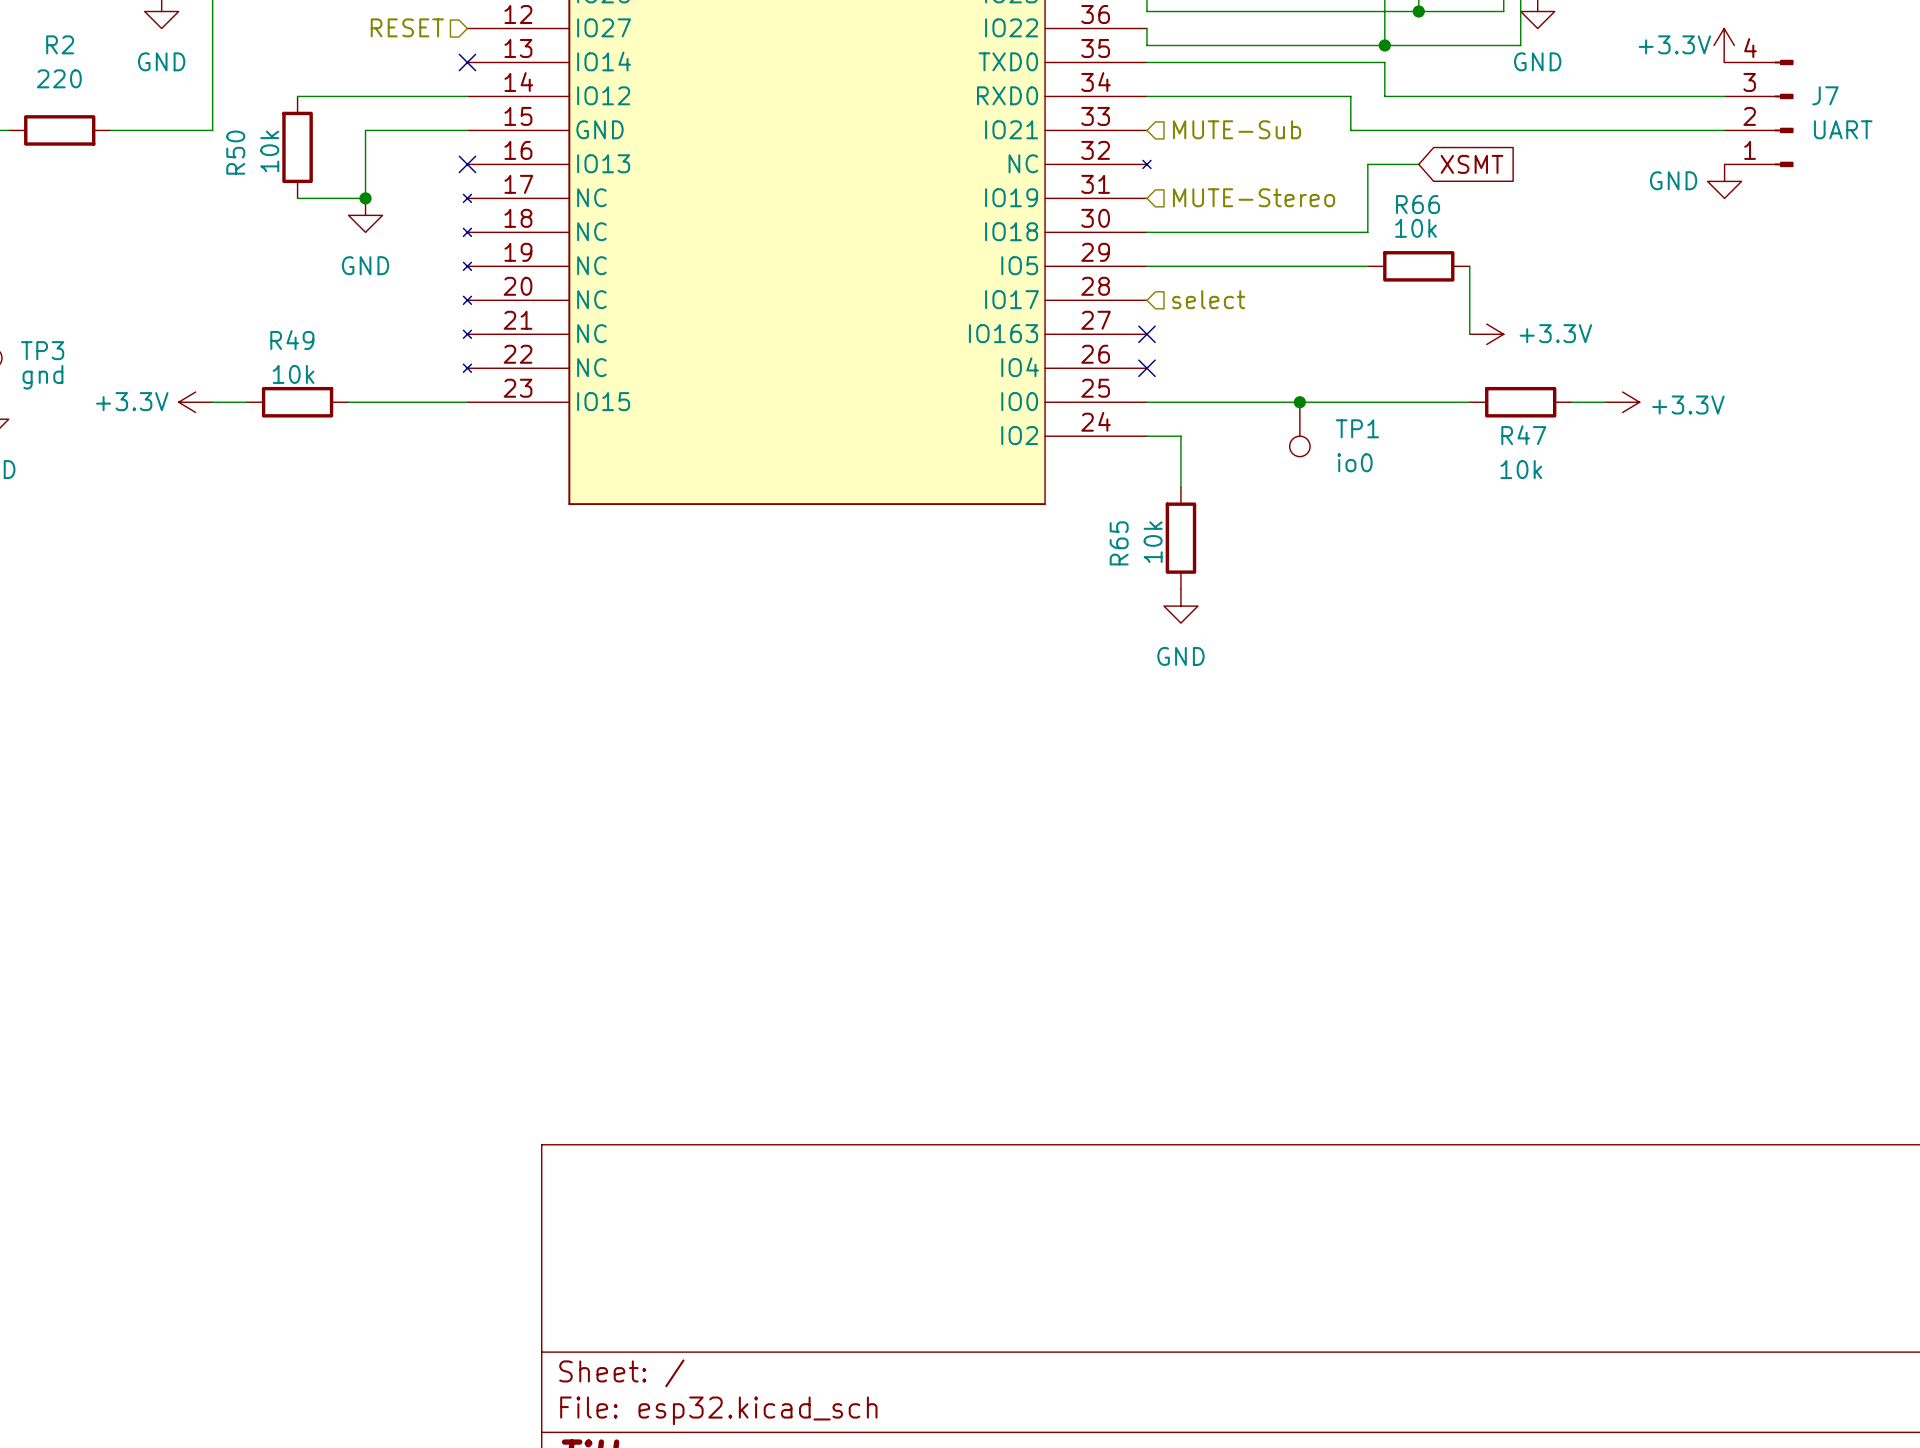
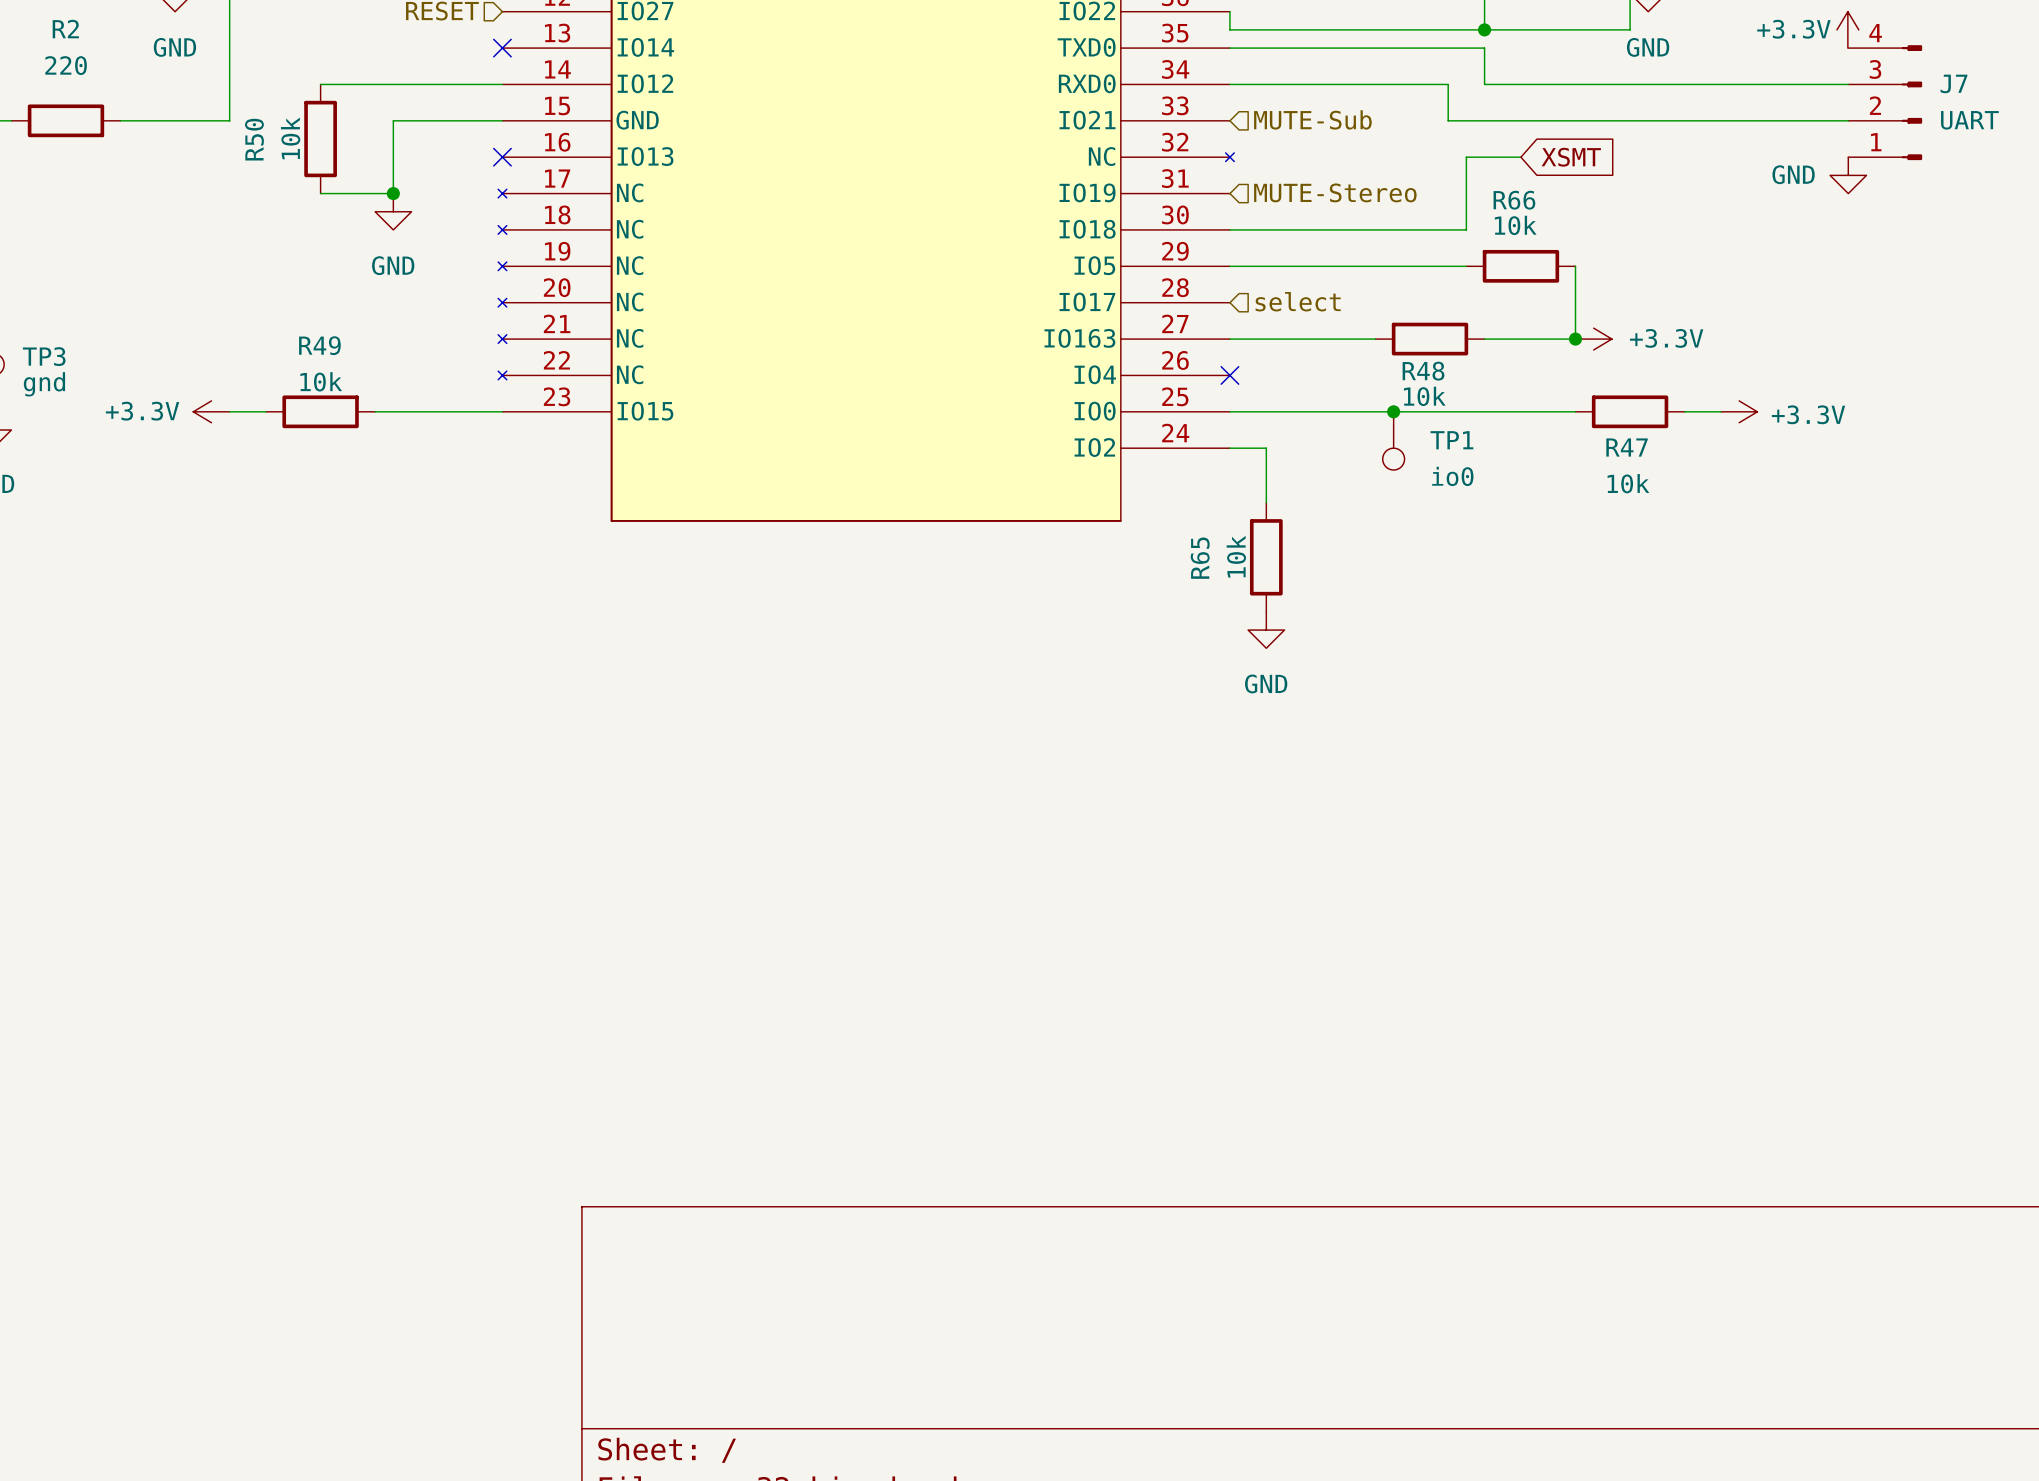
wire: none -> (1229, 339) (1375, 339)
no-connect mark: (1146, 334) -> none
R48: none -> 10k (1430, 339)
wire: none -> (1484, 339) (1575, 339)
junction: none -> (1575, 339)

